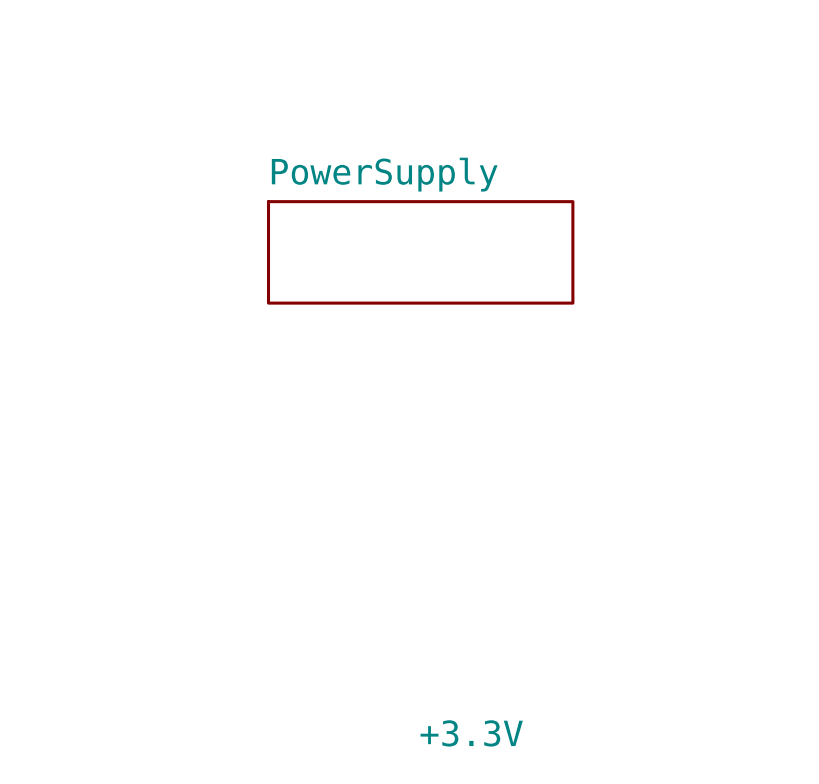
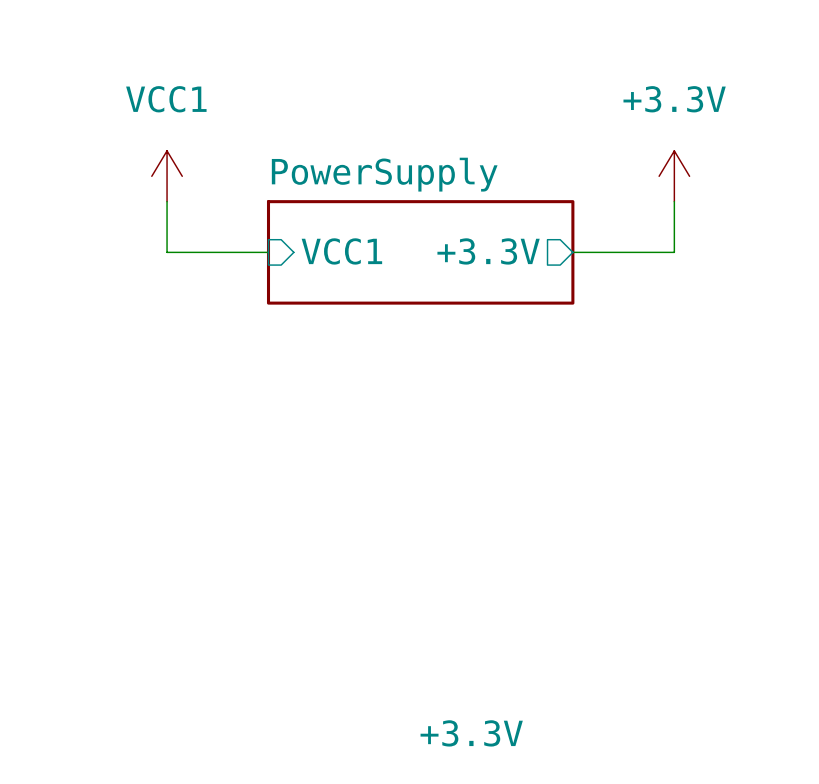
power symbol: none -> VCC1 (167, 176)
power symbol: none -> +3.3V (674, 176)
wire: none -> (167, 201) (167, 252) (268, 252)
wire: none -> (674, 201) (674, 252) (572, 252)
sheet pin: none -> VCC1 (341, 251)
sheet pin: none -> +3.3V (488, 251)

